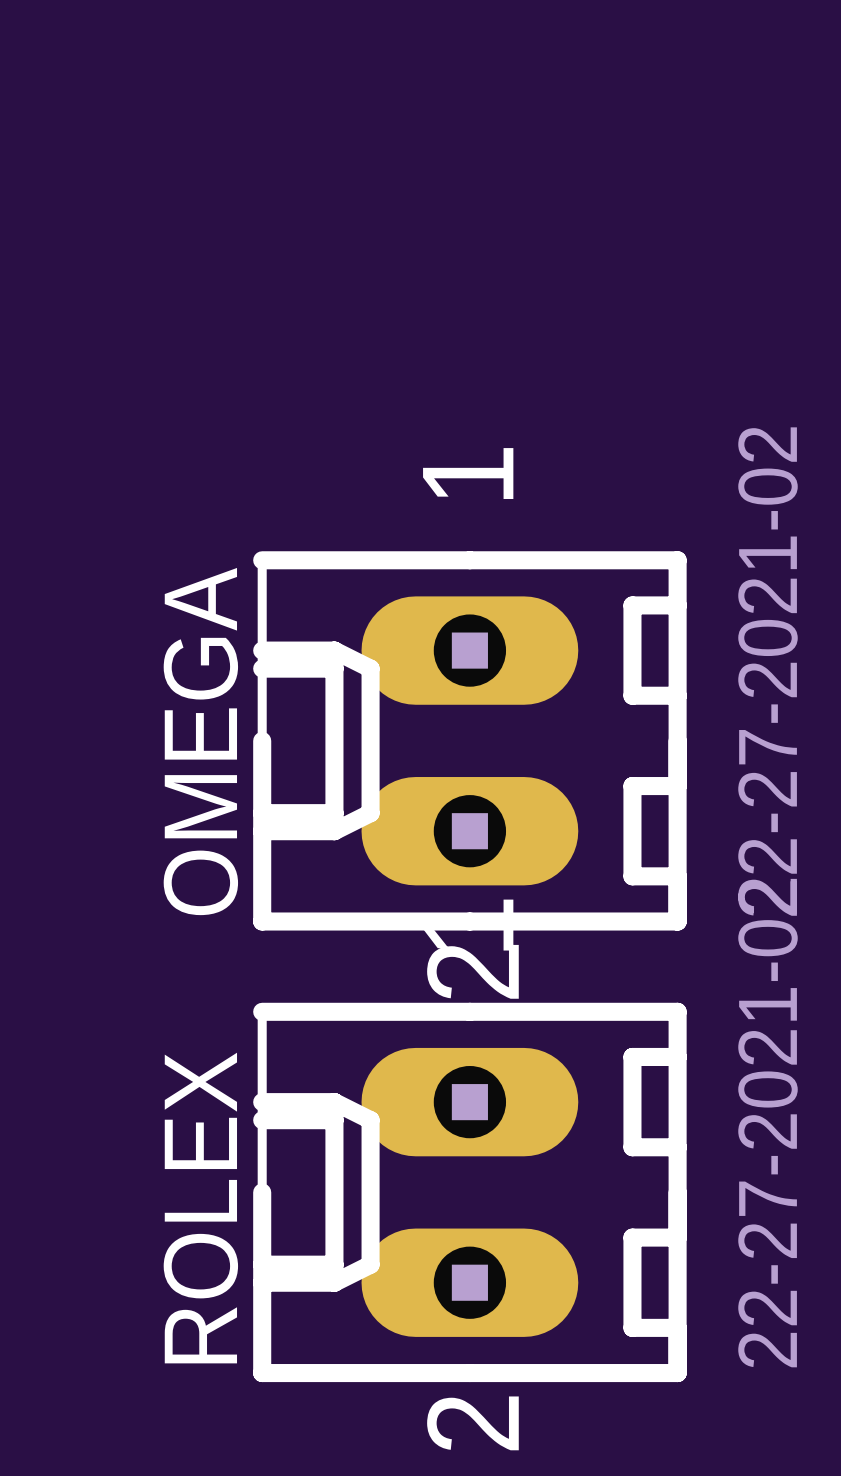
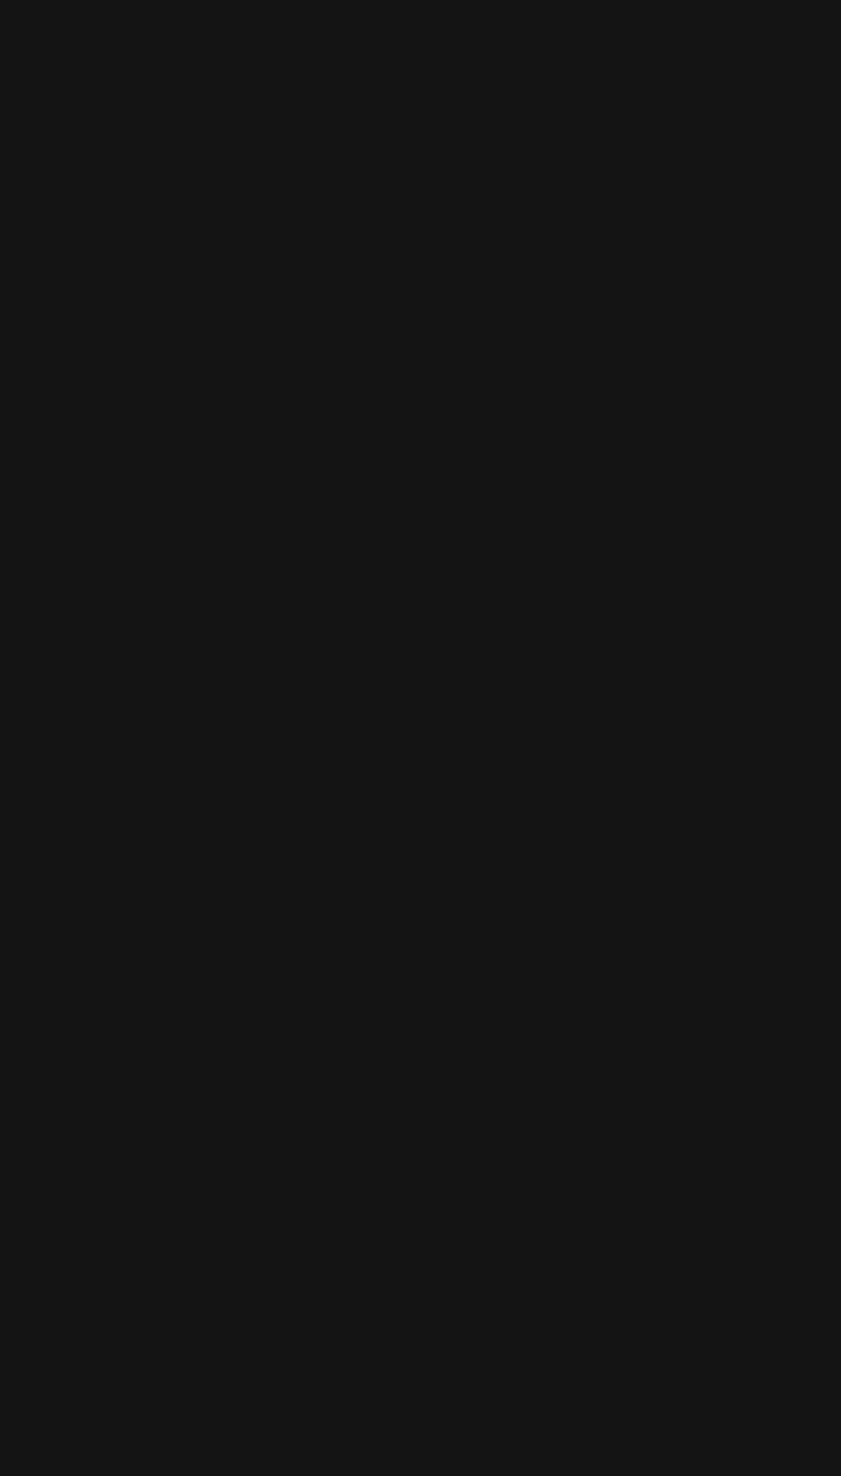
OMEGA: 22-27-2021-02 (469, 740) -> none
ROLEX: 22-27-2021-02 (469, 1192) -> none

